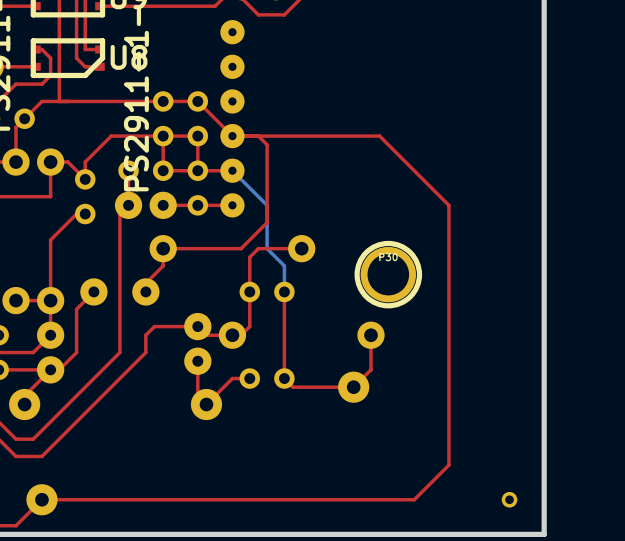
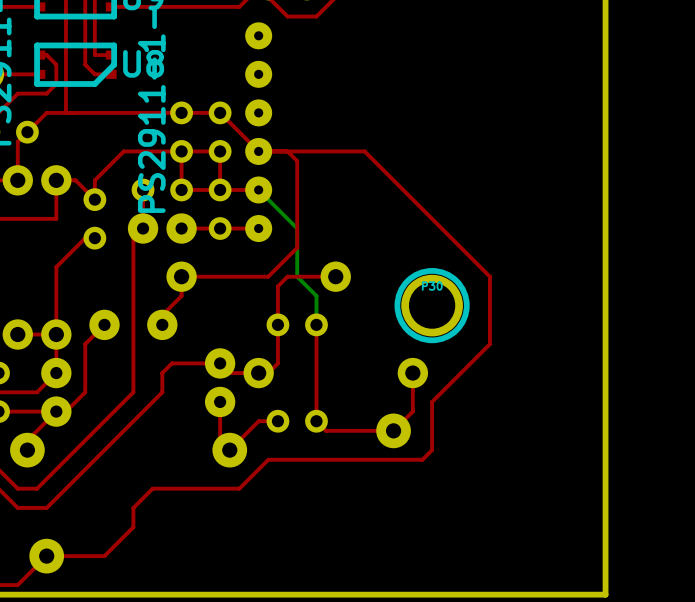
top track: (327, 136) (379, 136) (448, 205) (448, 465) (414, 499) (93, 499) -> (364, 151) (489, 276) (489, 344) (432, 401) (432, 450) (422, 459) (268, 459) (239, 488) (152, 488) (133, 507) (133, 527) (104, 556)
part: (509, 499) -> none

